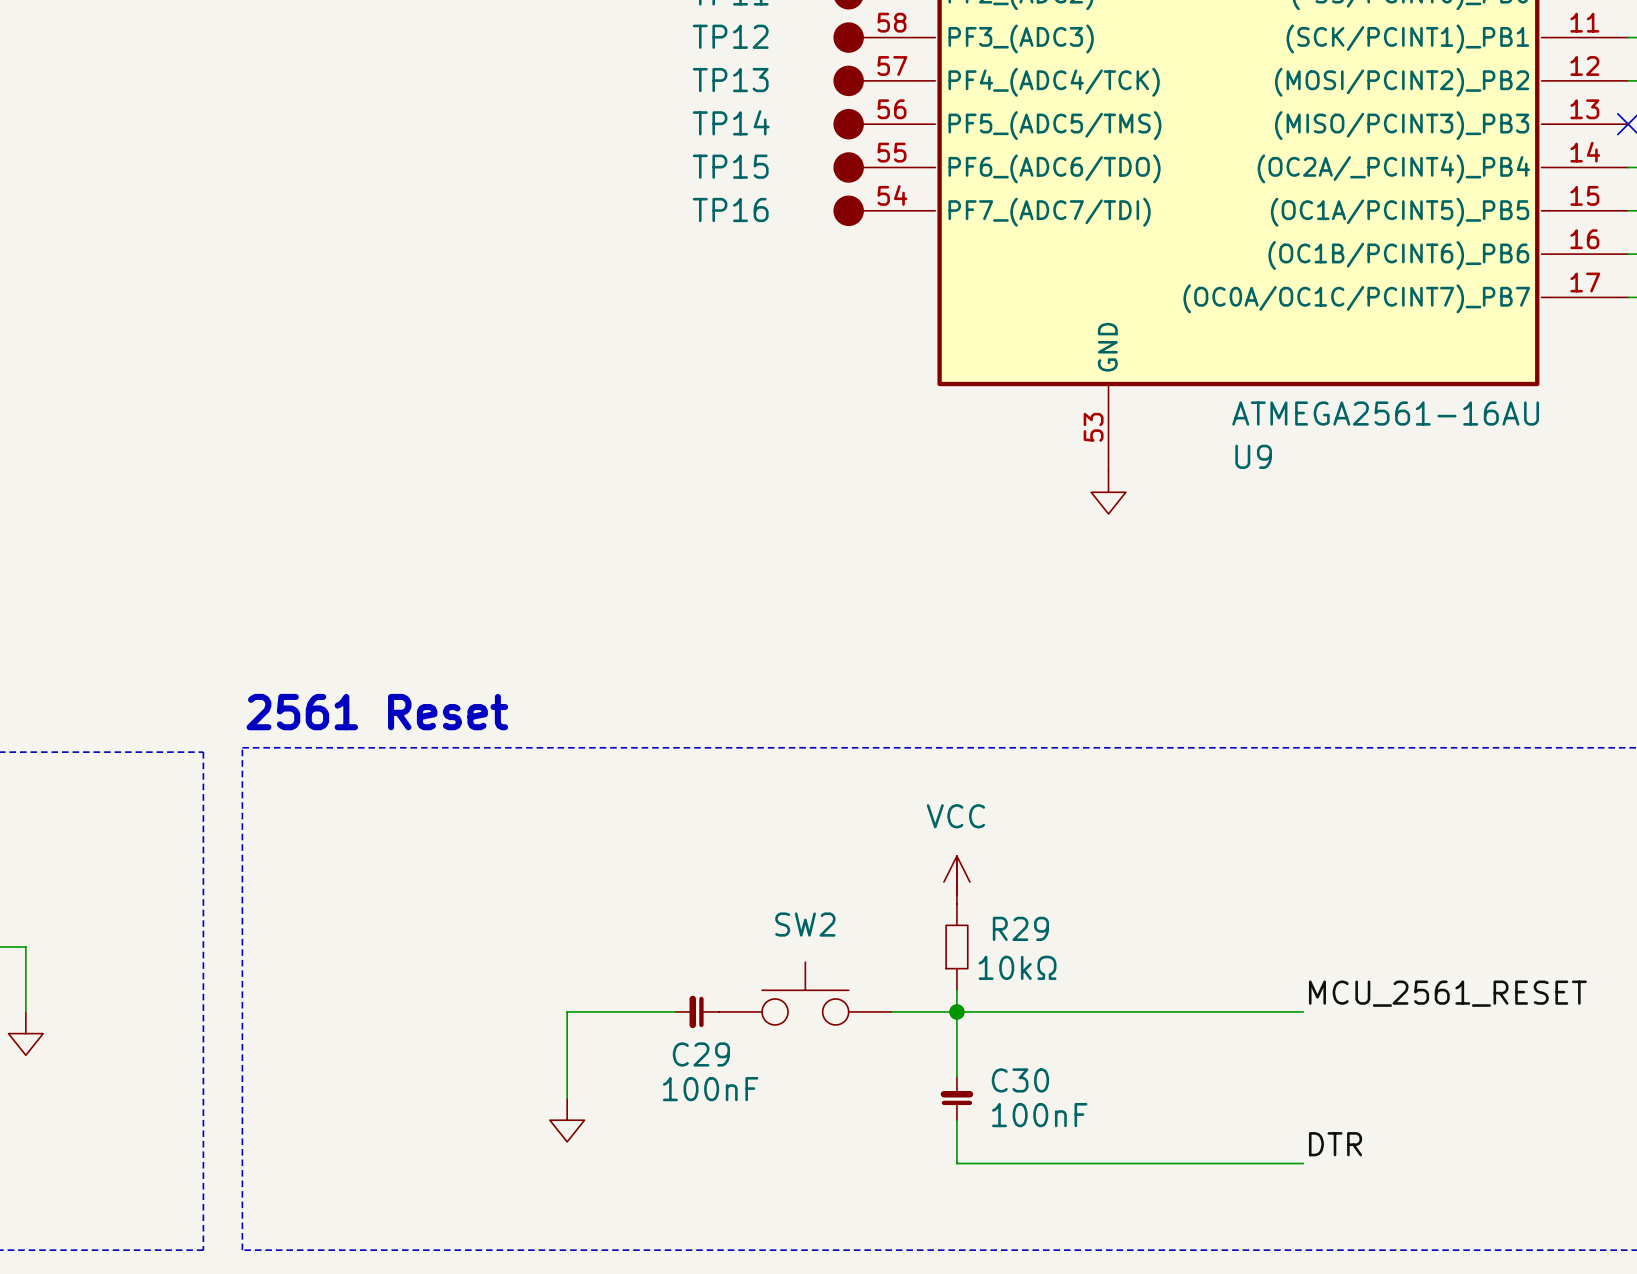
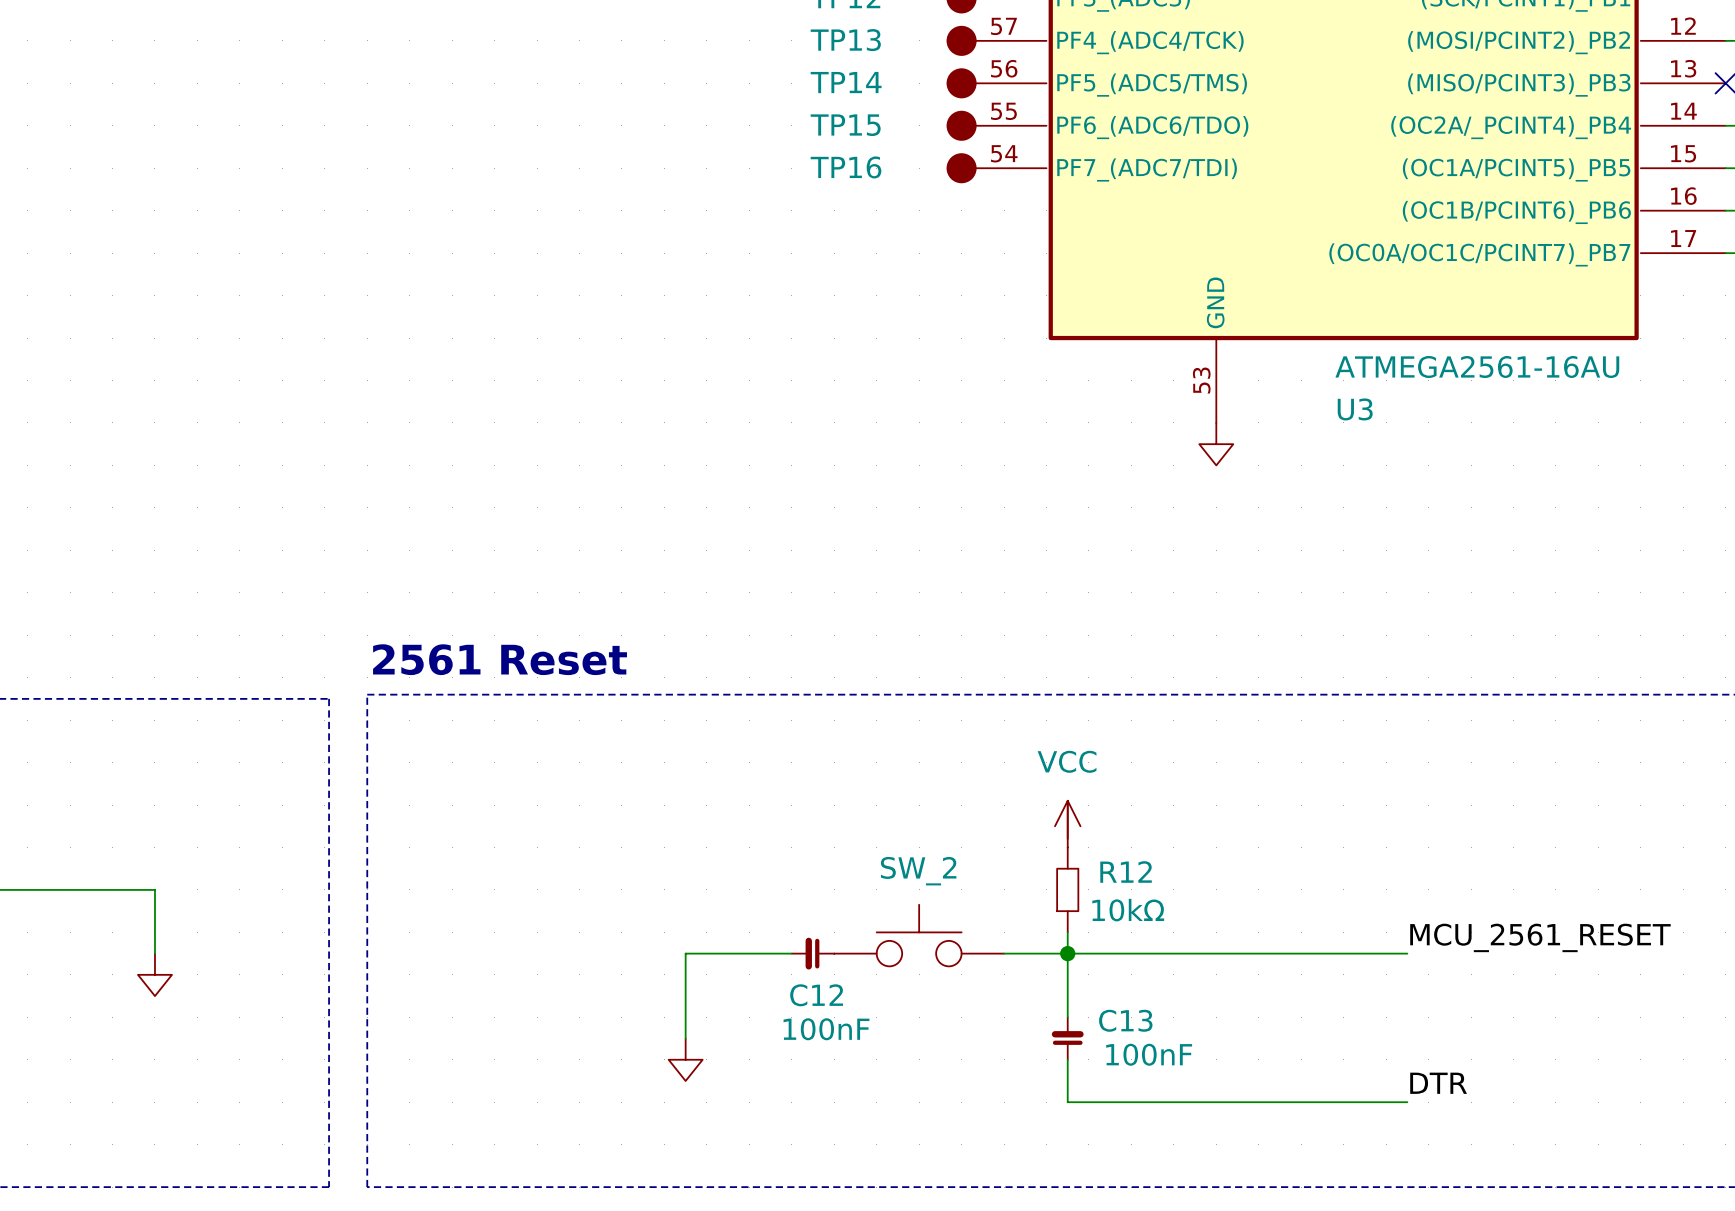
U9 name: U9 (1253, 456) -> U3 (1355, 409)
SW2 name: SW2 (805, 924) -> SW_2 (918, 871)
R29 name: R29 (1020, 928) -> R12 (1126, 871)
C29 name: C29 (701, 1054) -> C12 (816, 995)
C30 name: C30 (1020, 1080) -> C13 (1125, 1020)

